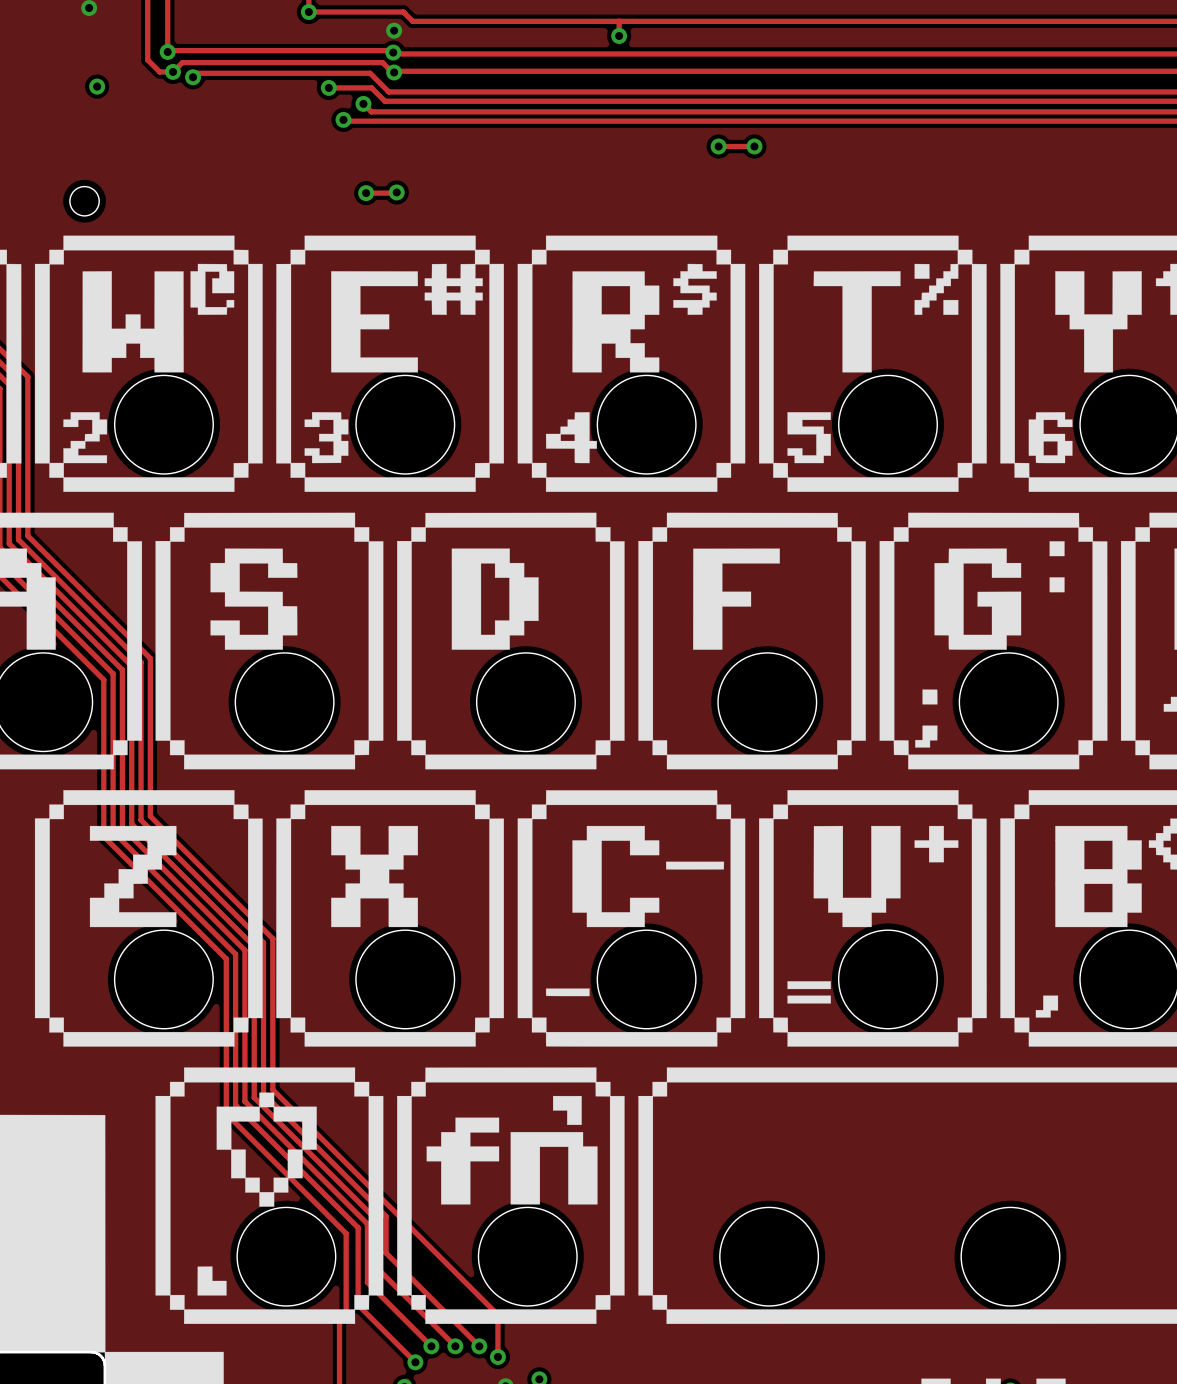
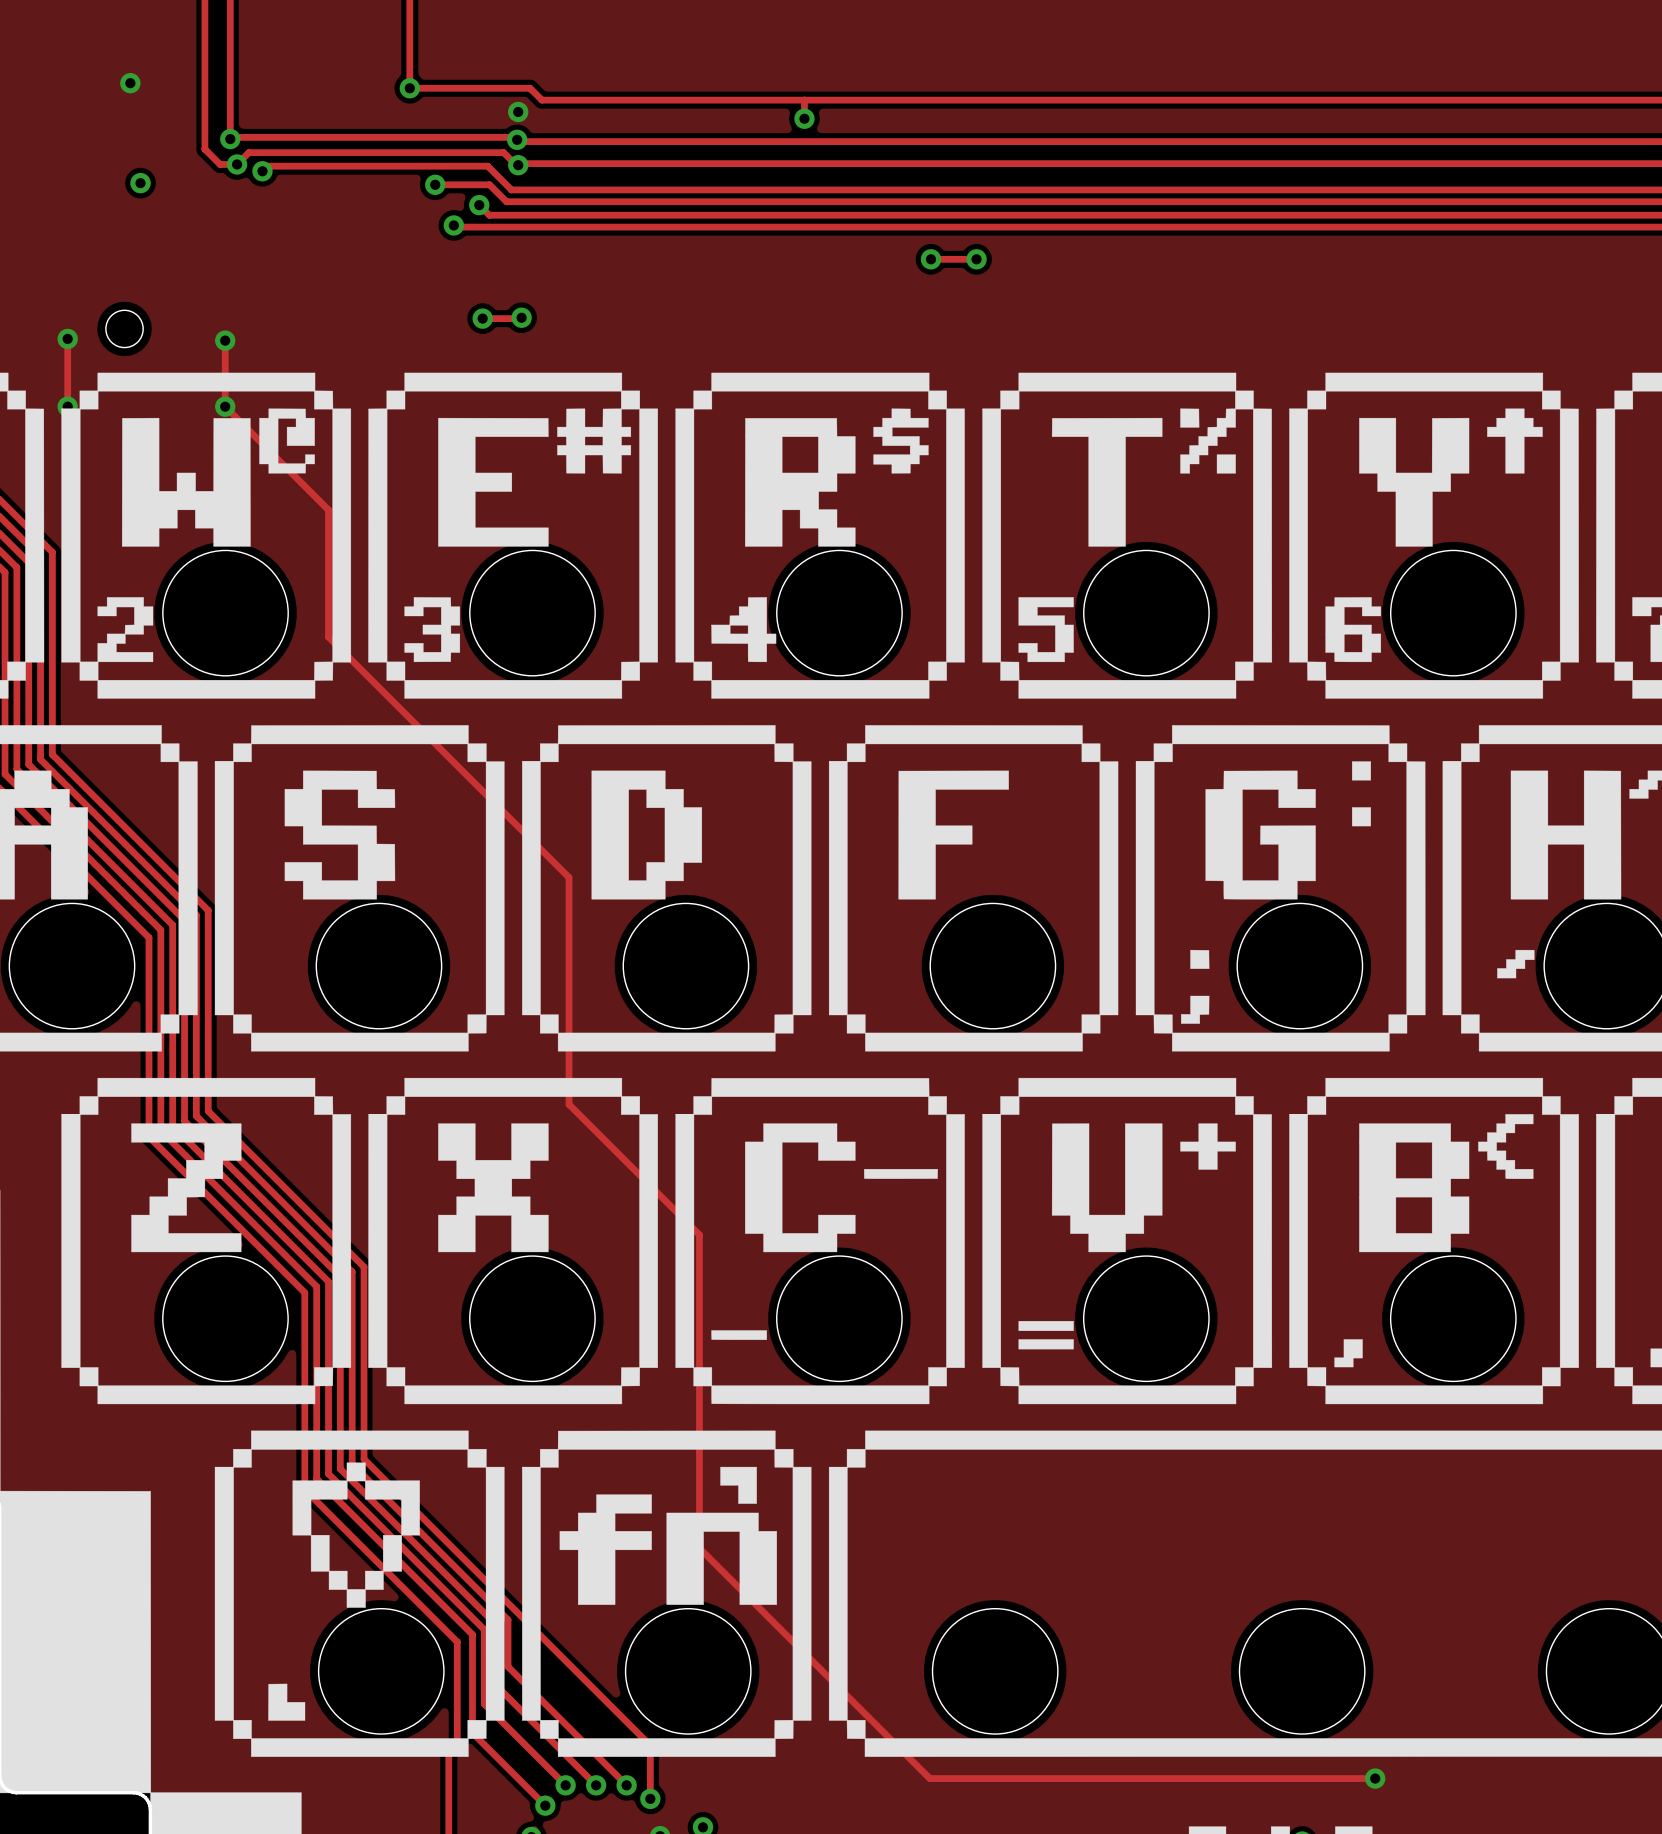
track: none -> (67, 338) (67, 406)
via: none -> (67, 338)
track: none -> (225, 340) (225, 406) (328, 509) (328, 637) (569, 877) (569, 1104) (699, 1234) (699, 1548) (929, 1778) (1375, 1778)
via: none -> (225, 340)
via: none -> (67, 406)
via: none -> (225, 406)
via: none -> (1375, 1778)

